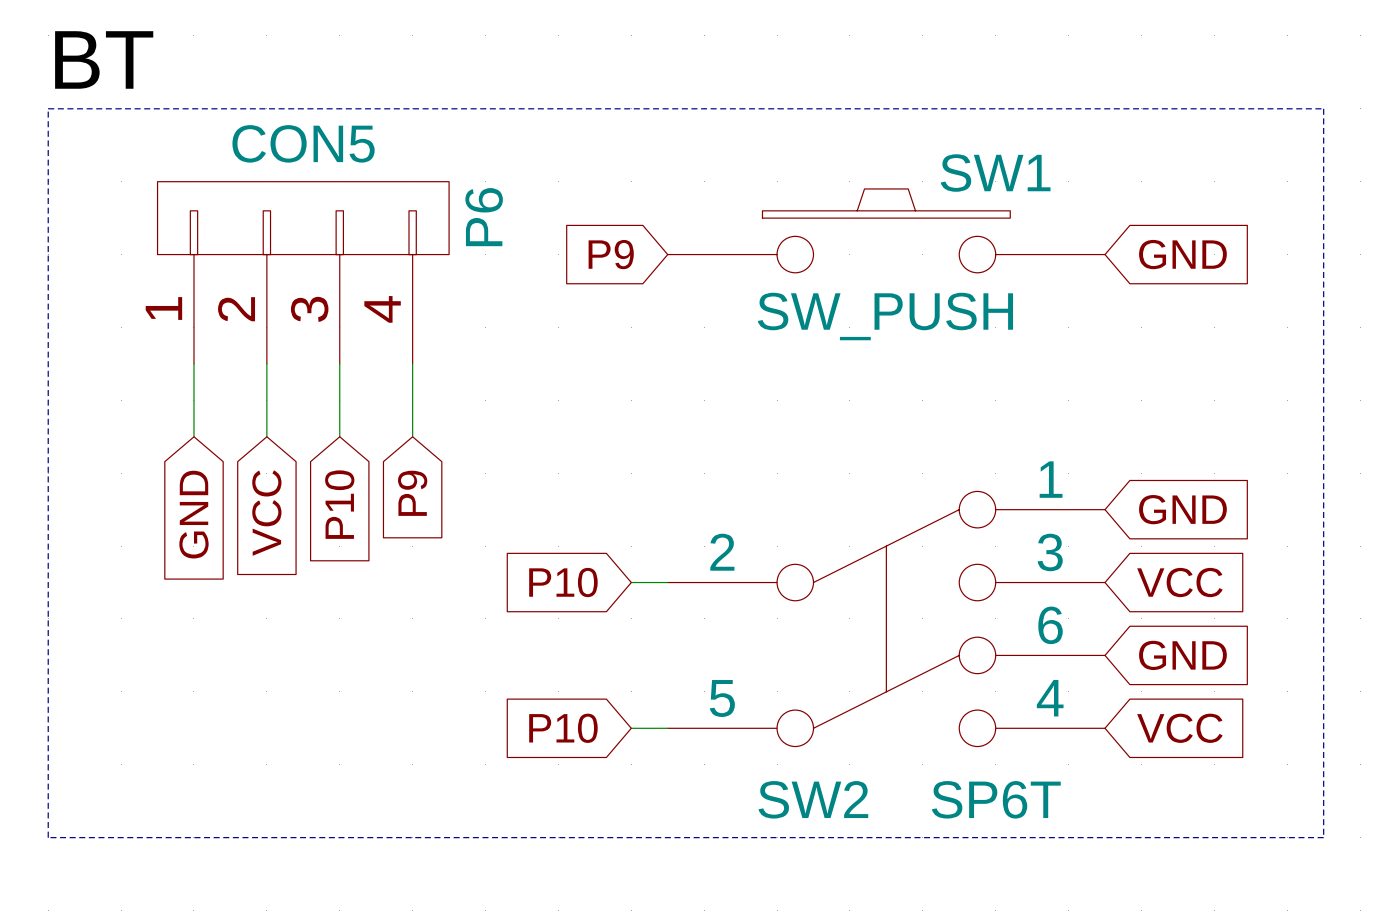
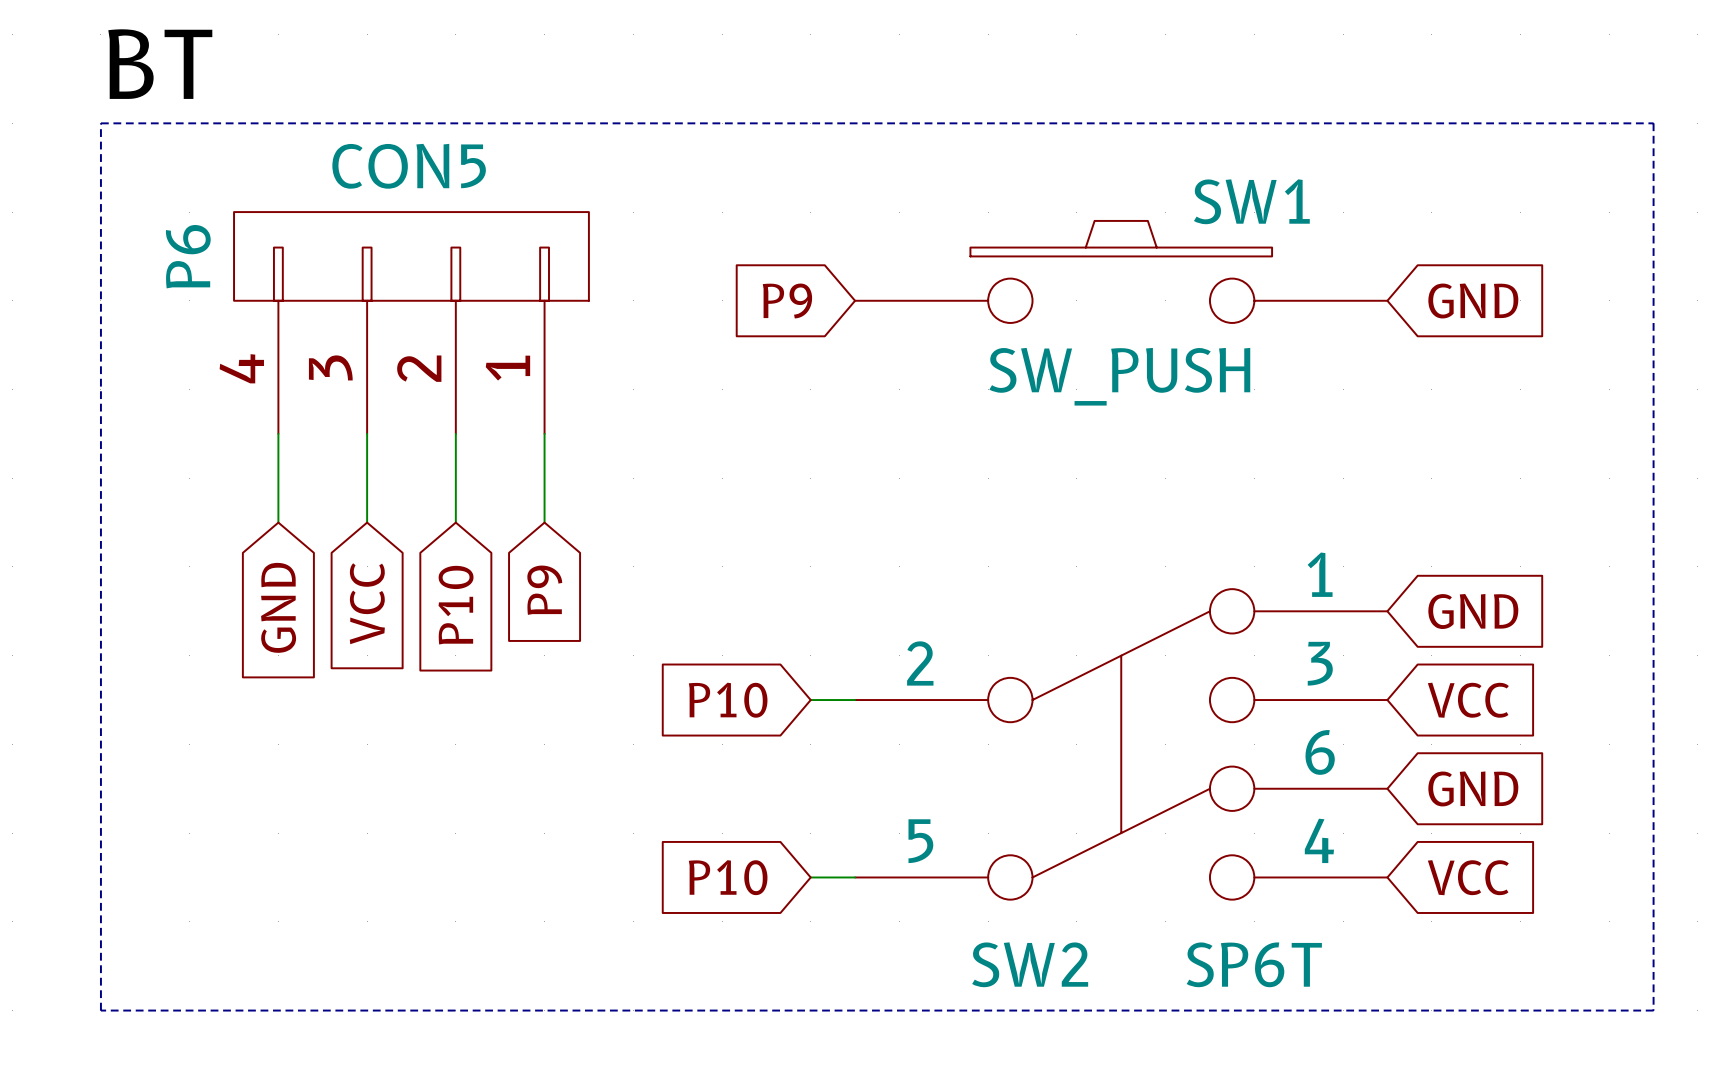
P6 flip: as is (303, 218) -> left-right (411, 256)

